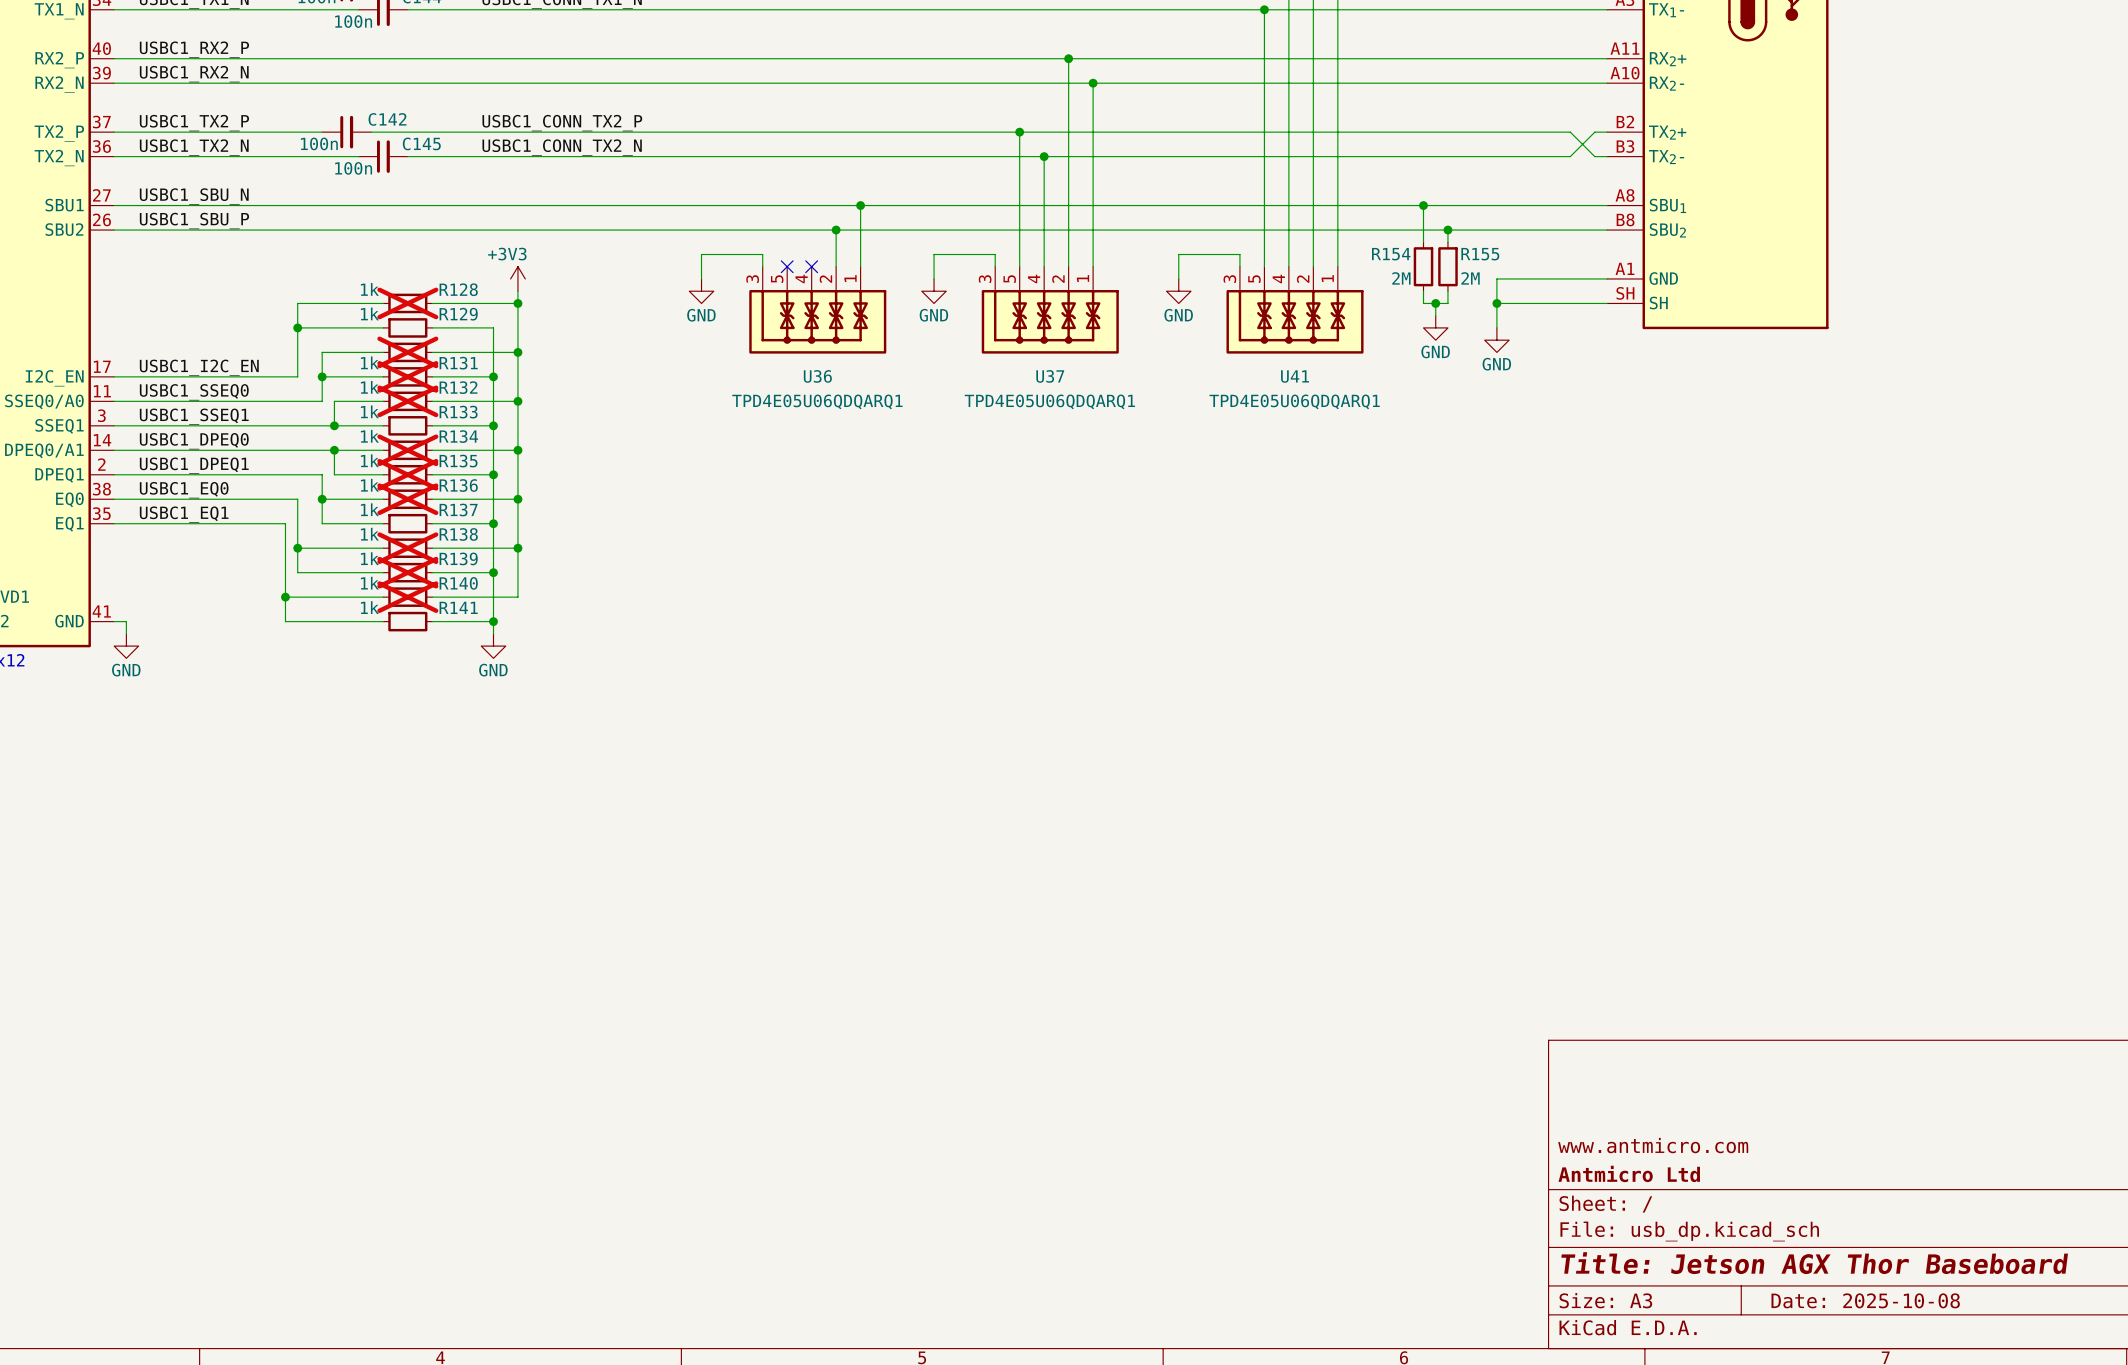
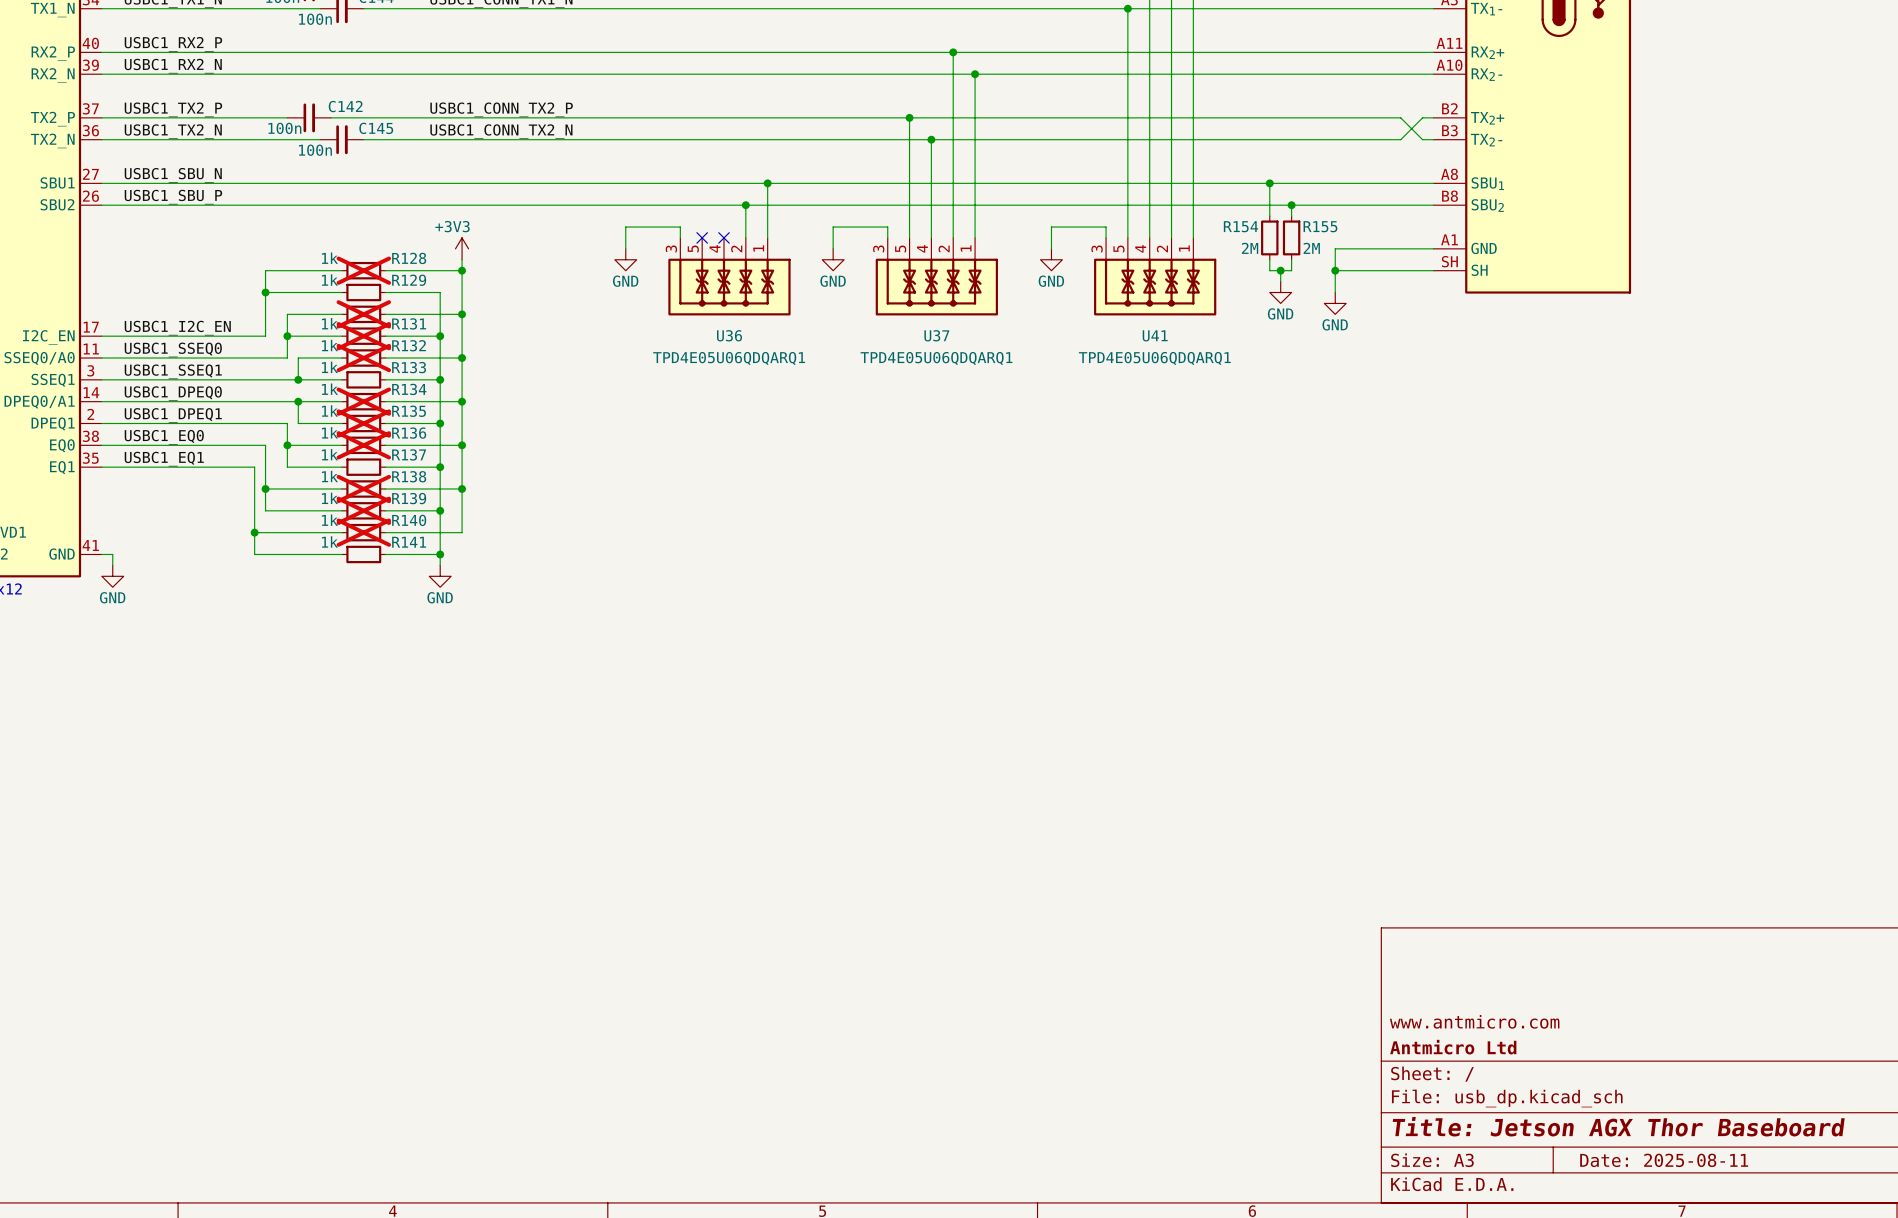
title block: Date: 2025-10-08 (1865, 1300) -> Date: 2025-08-11 (1664, 1160)

